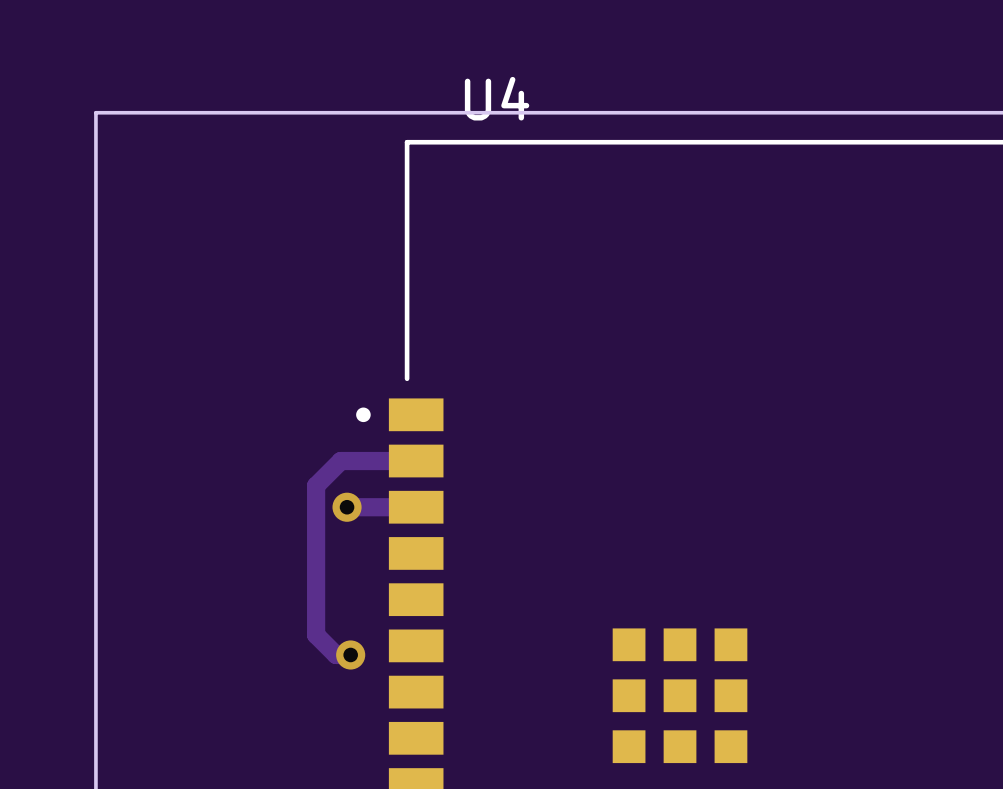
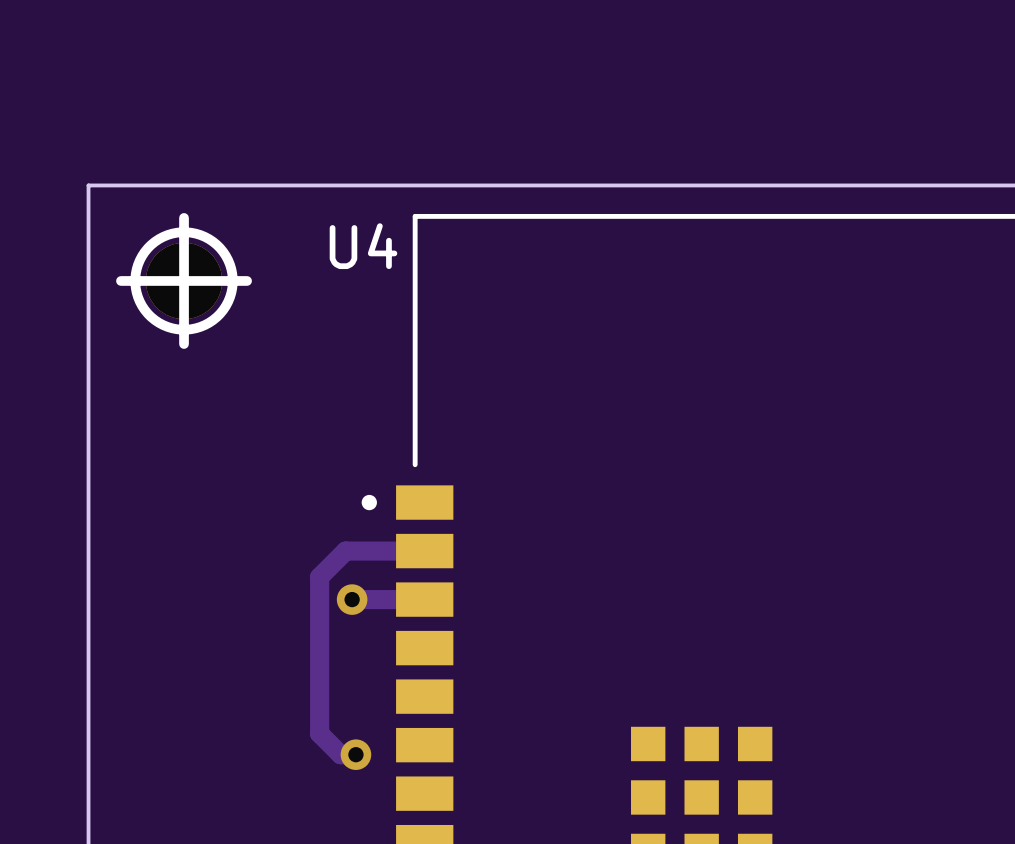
U4 name position: U4 (497, 98) -> U4 (363, 246)
part: none -> (184, 280)

